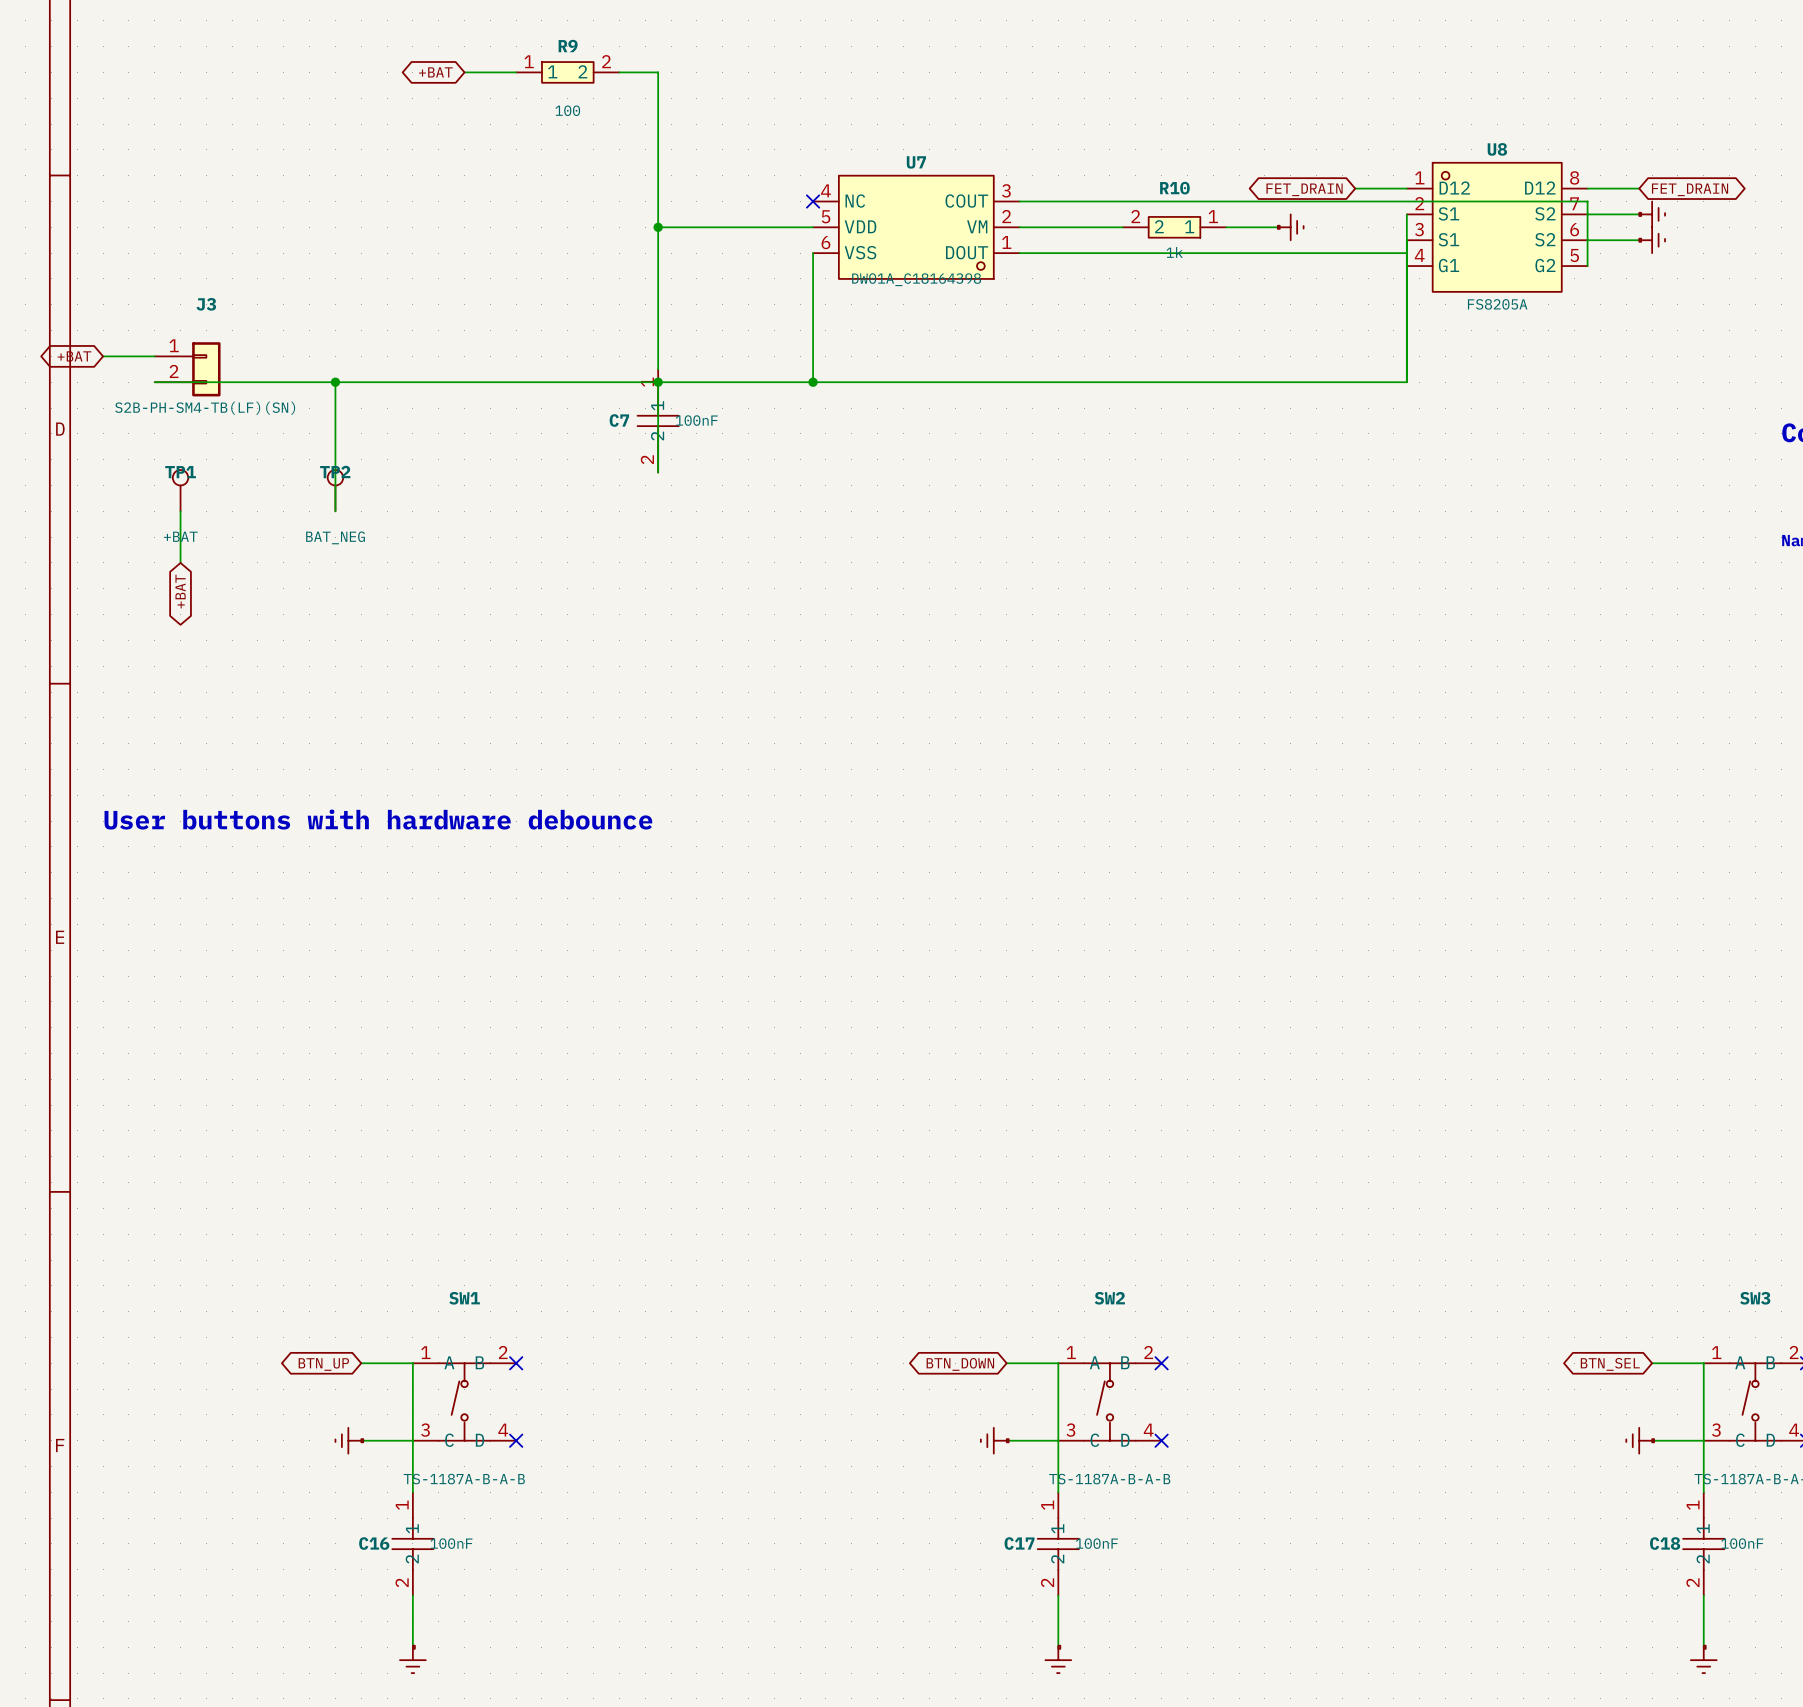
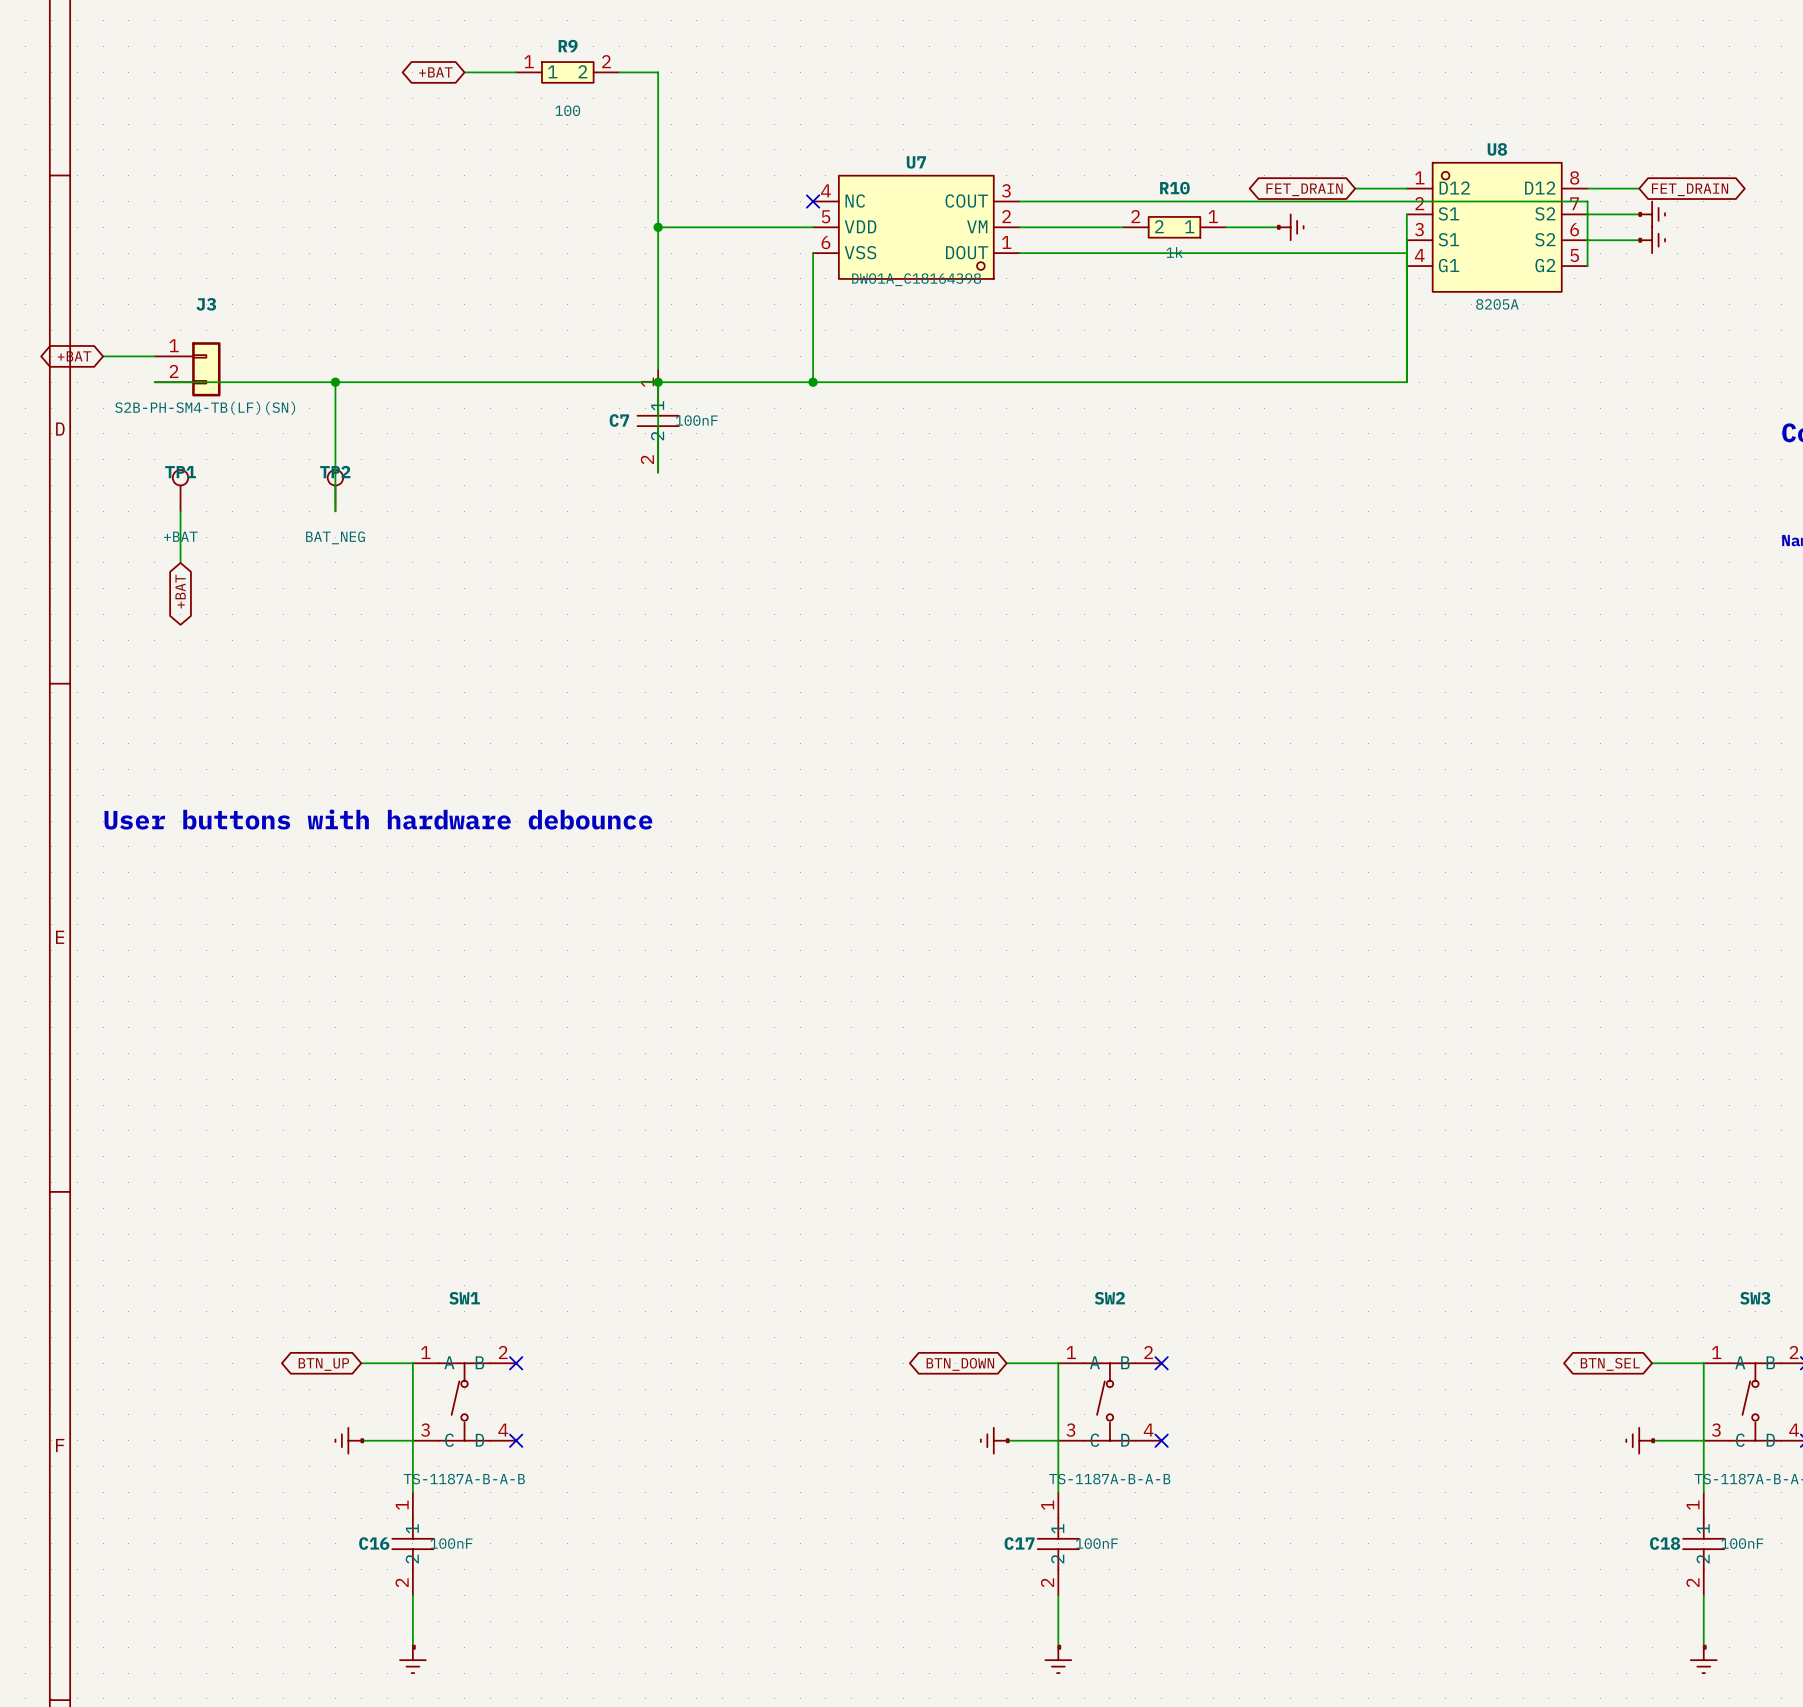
U8 value: FS8205A (1497, 304) -> 8205A (1497, 304)

